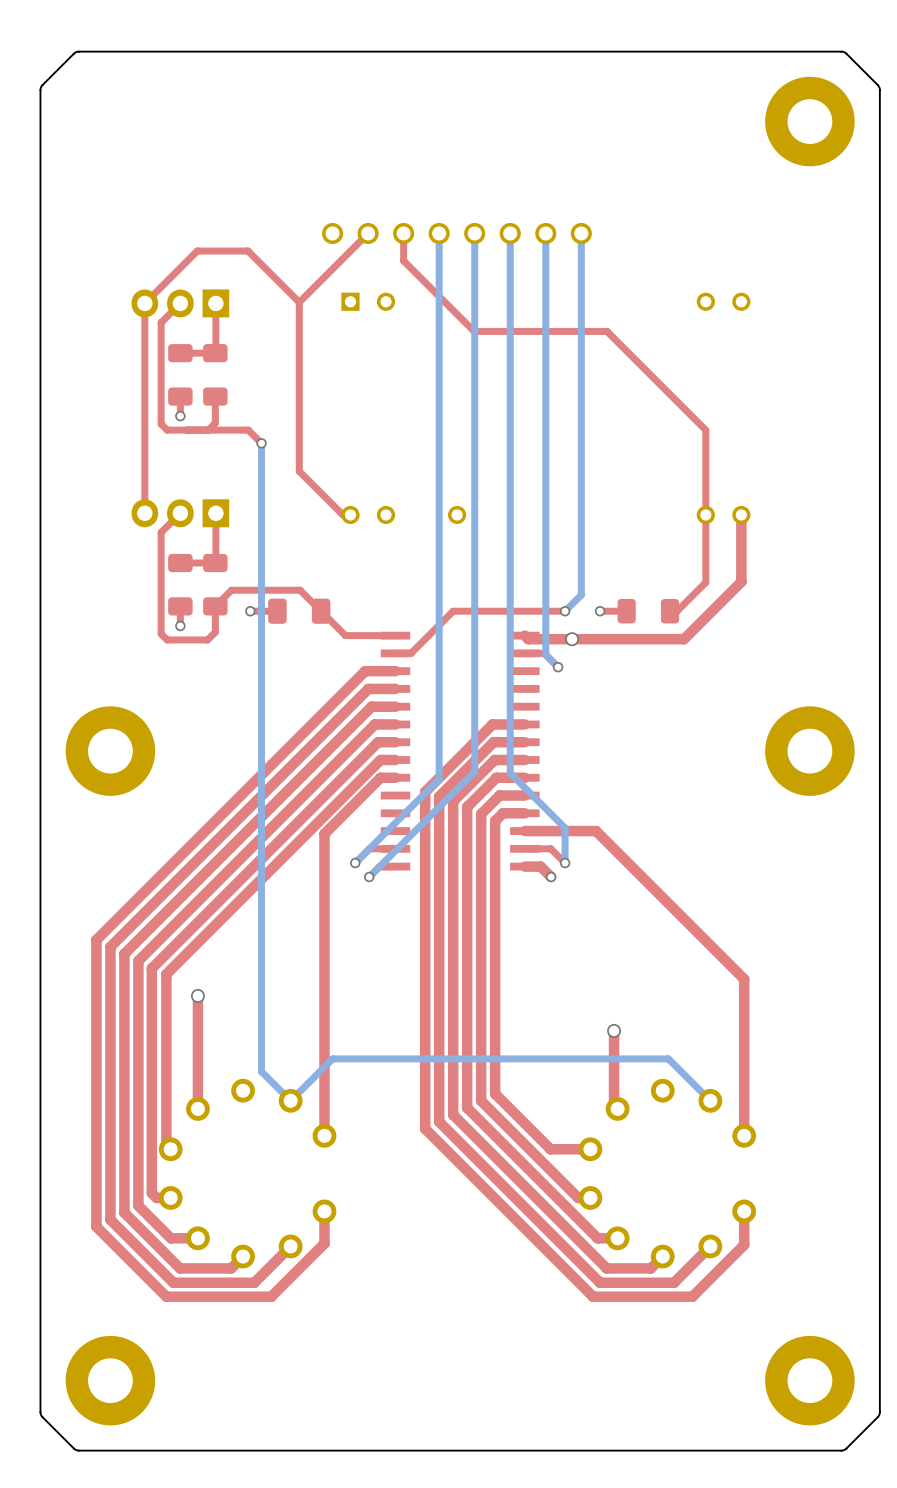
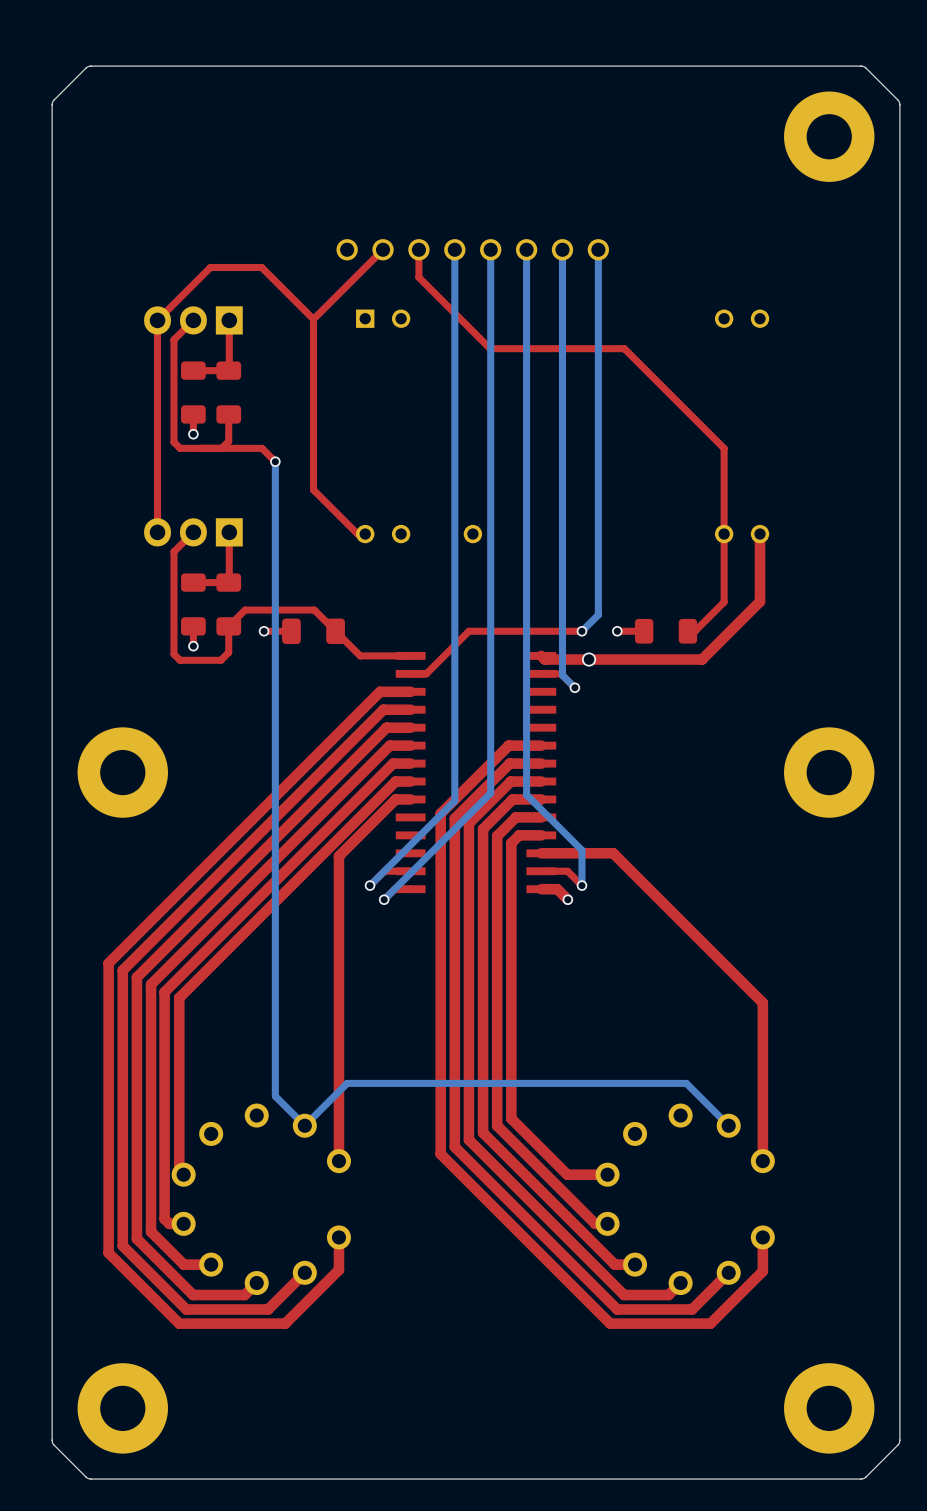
top track: (197, 995) (197, 1108) -> none
via: (197, 995) -> none
top track: (614, 1030) (614, 1105) -> none
via: (614, 1030) -> none

